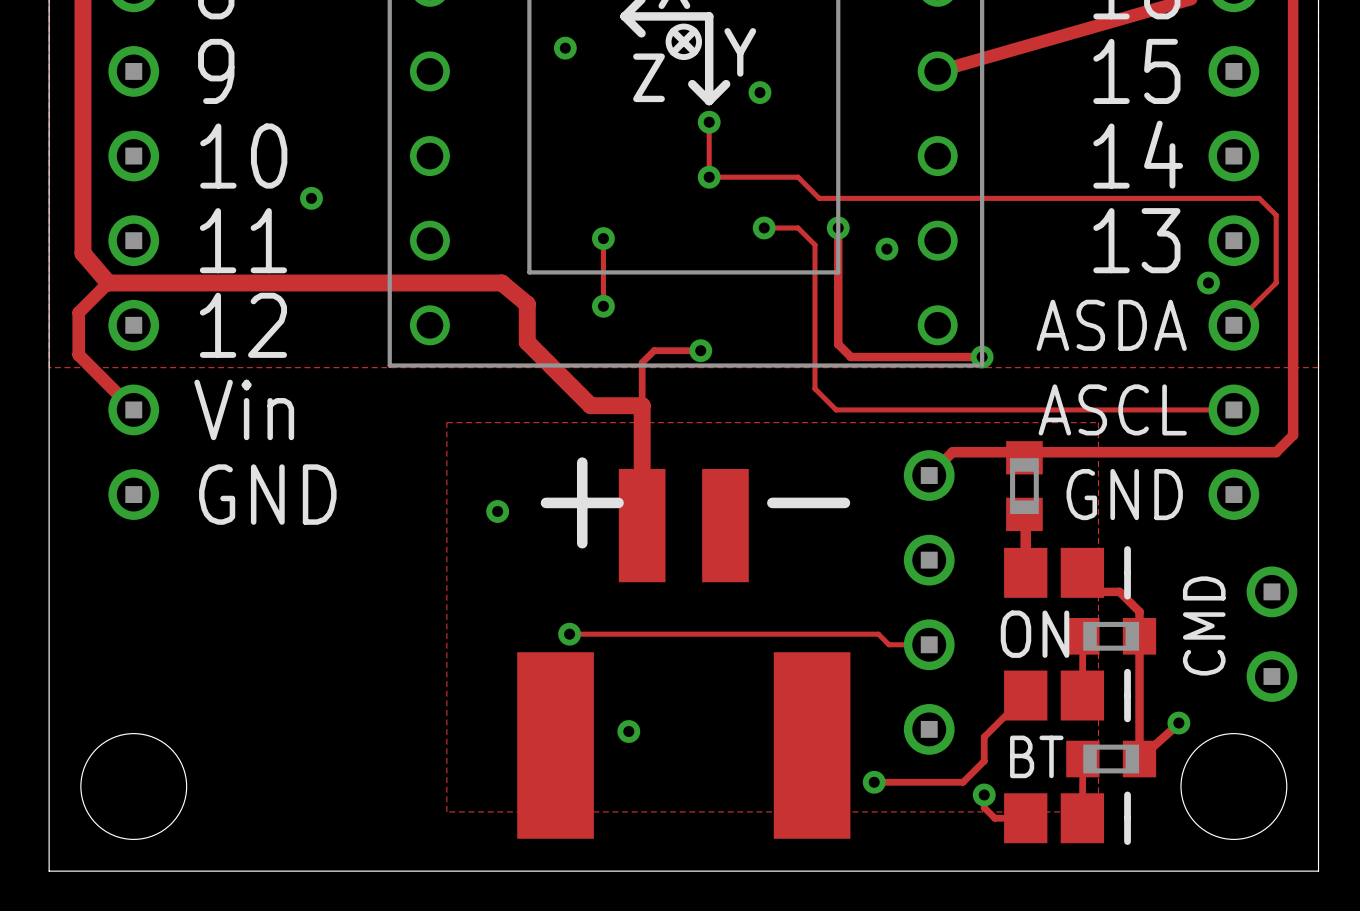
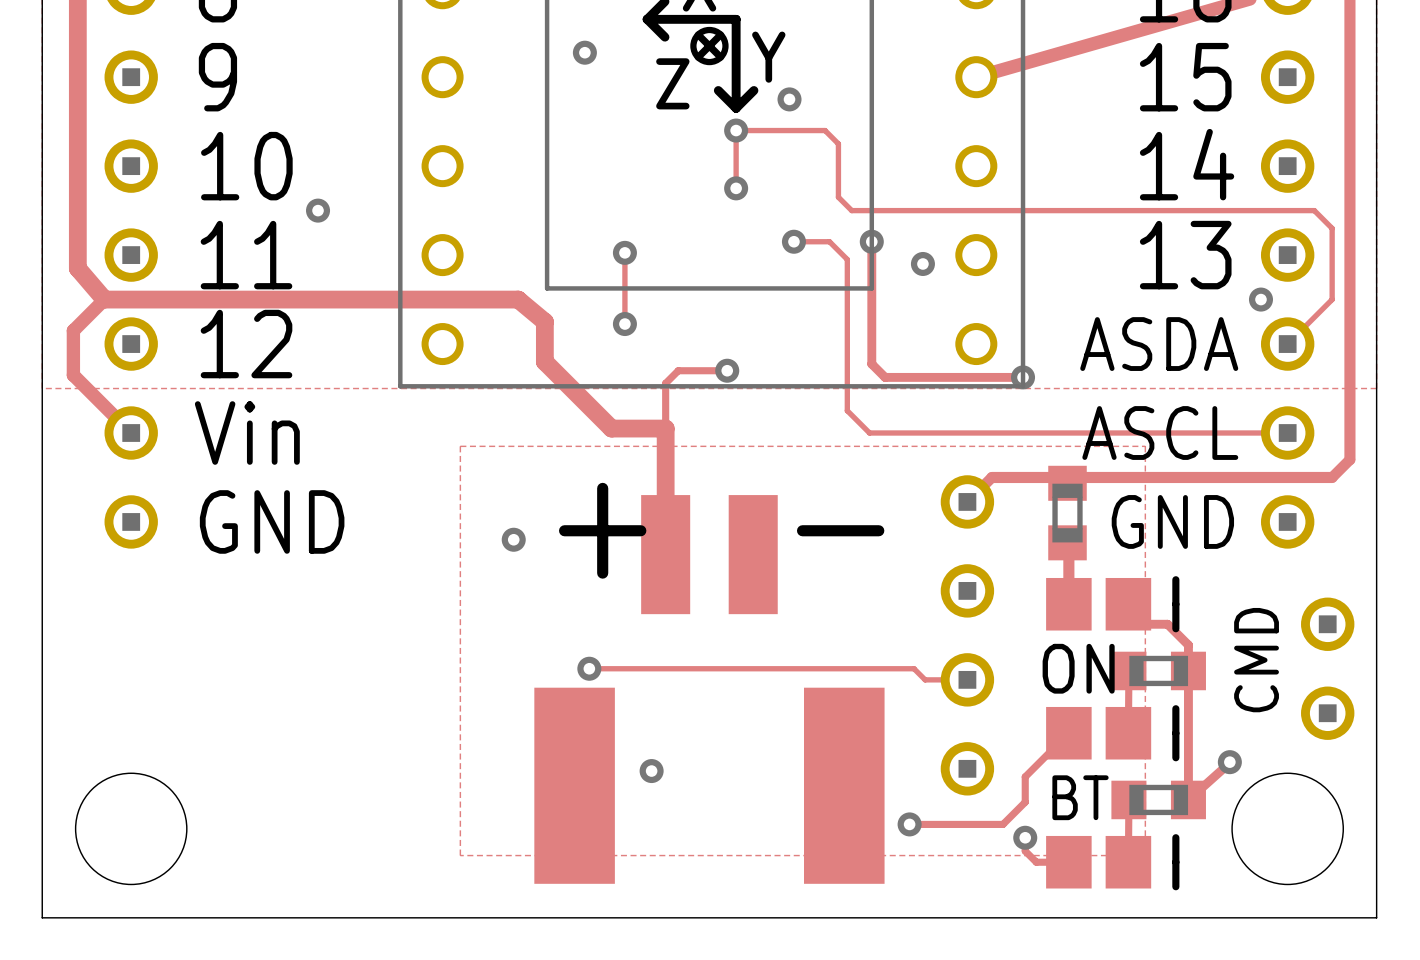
track: (709, 177) (798, 177) (806, 185) -> (736, 130) (825, 130) (838, 143) (838, 197)

